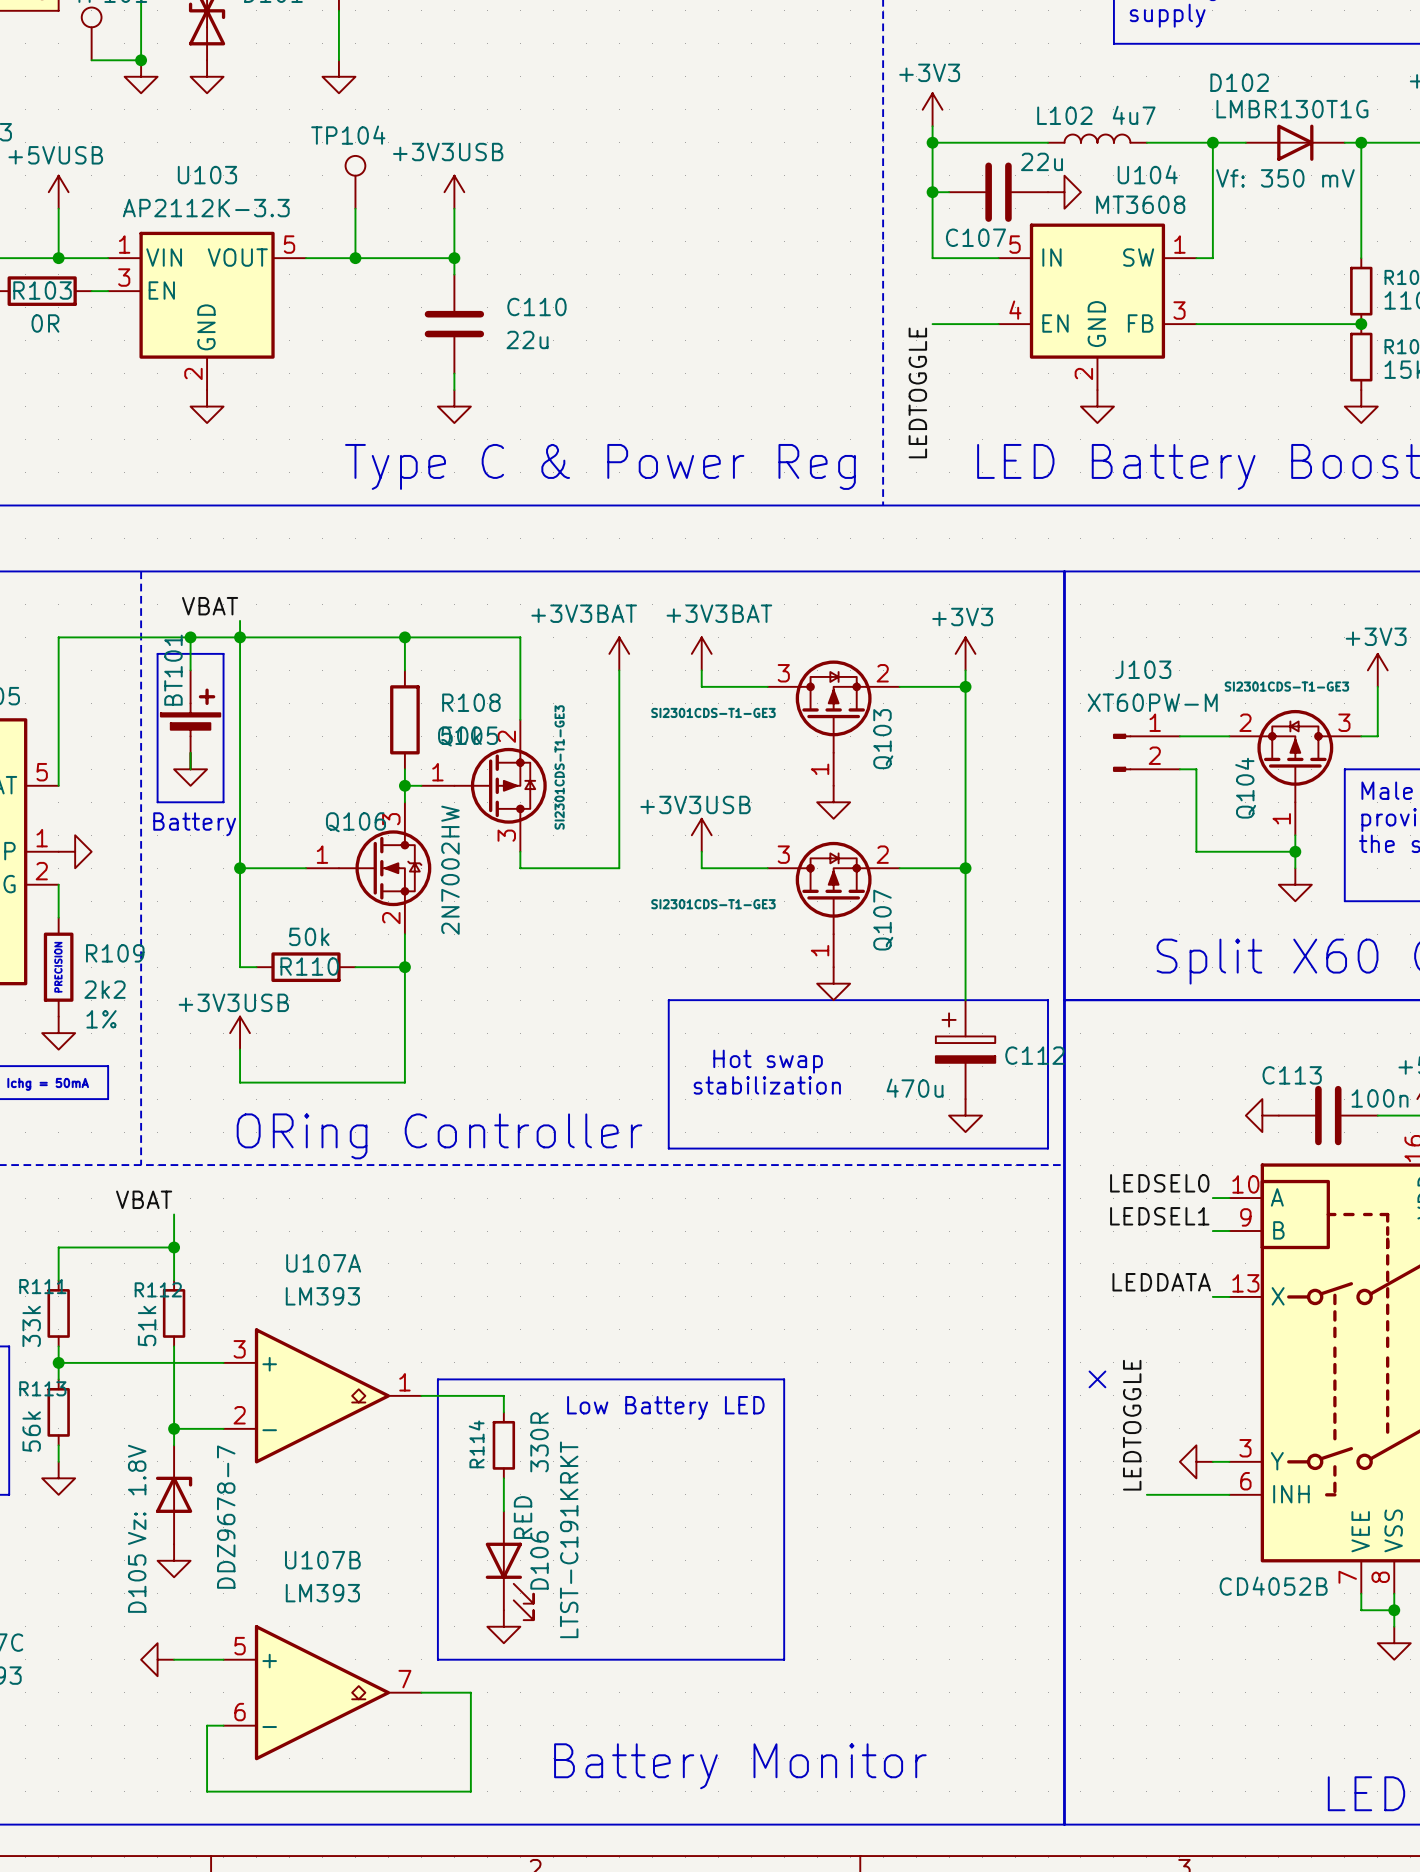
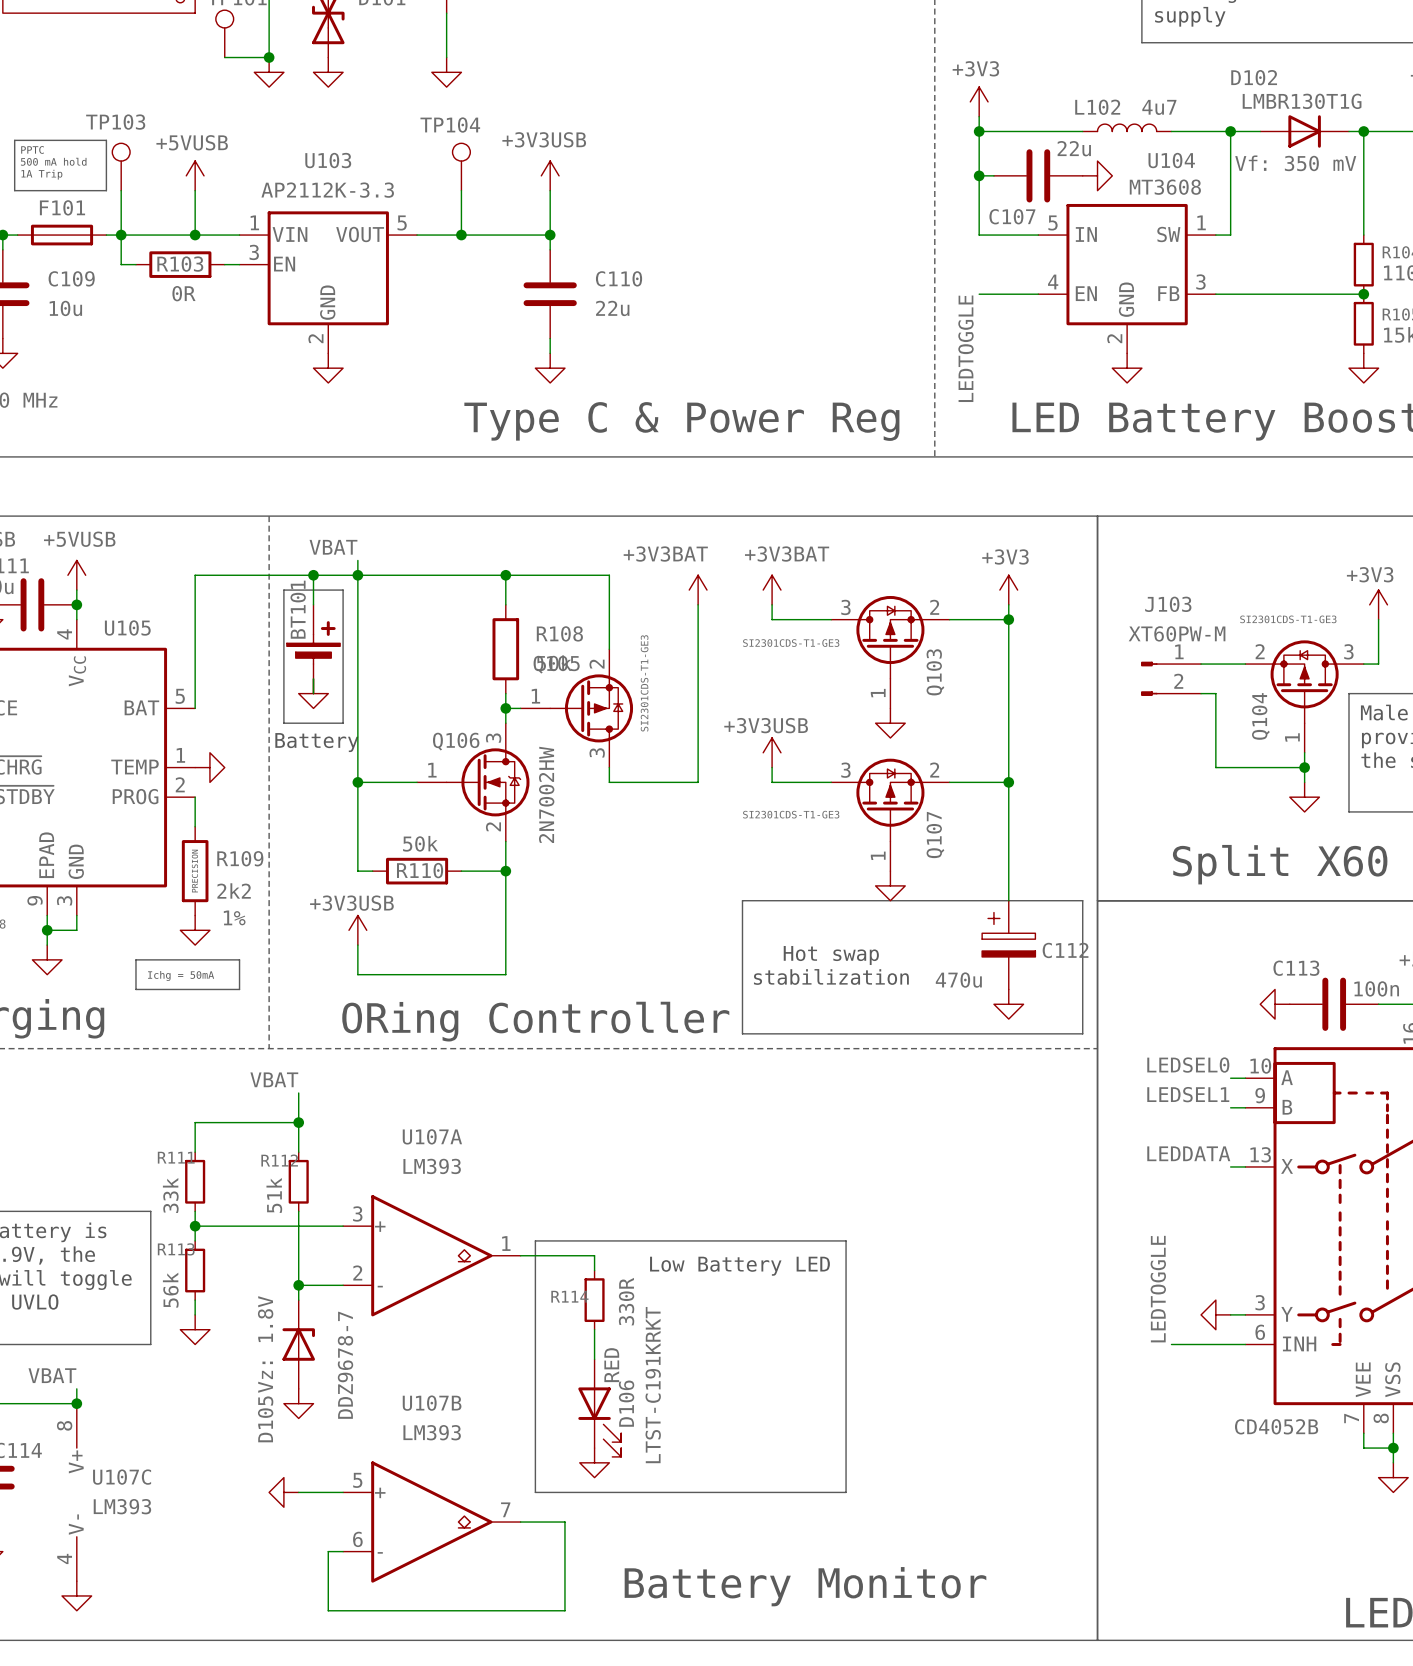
no-connect mark: (1097, 1379) -> none
R114 name rotation: 0° (476, 1444) -> 90° clockwise (569, 1296)

